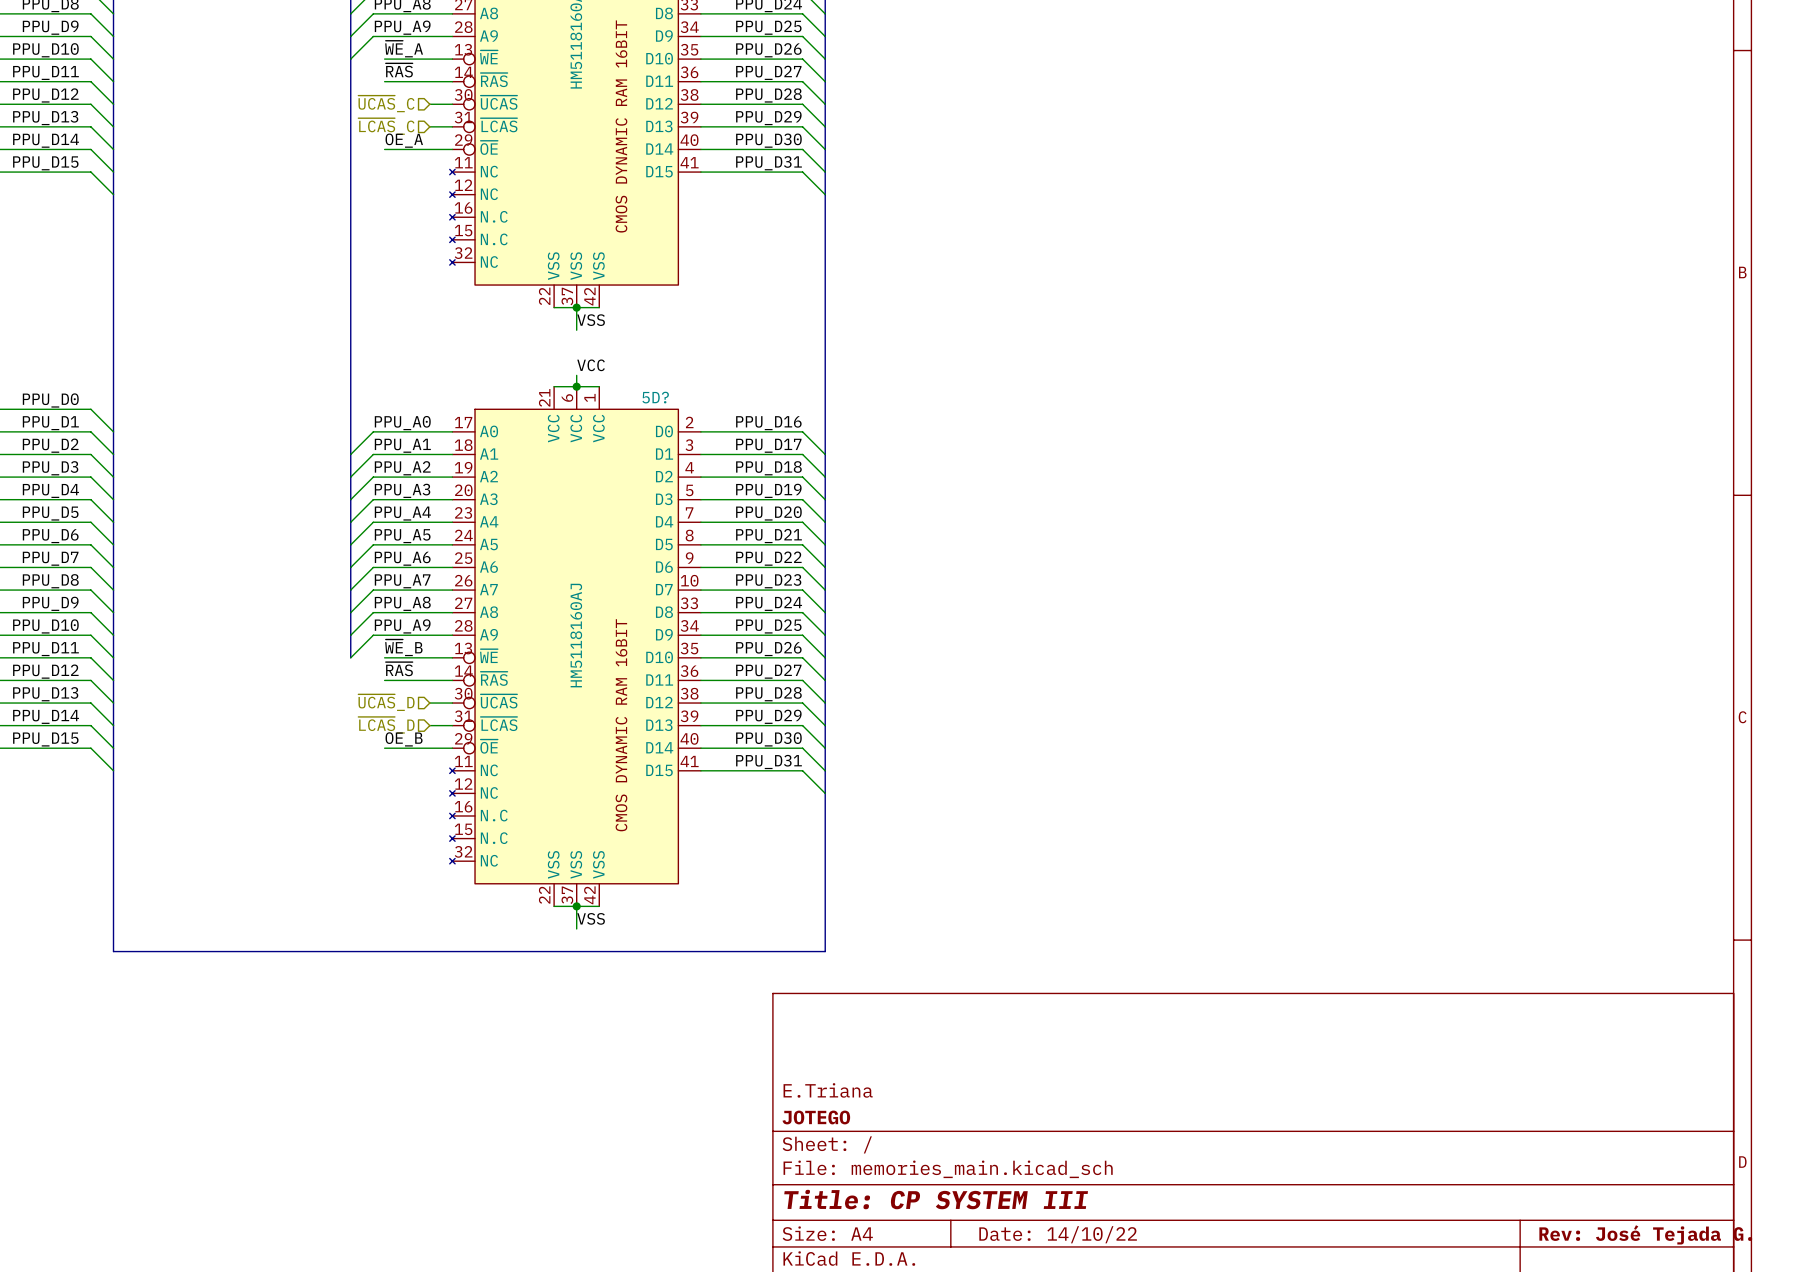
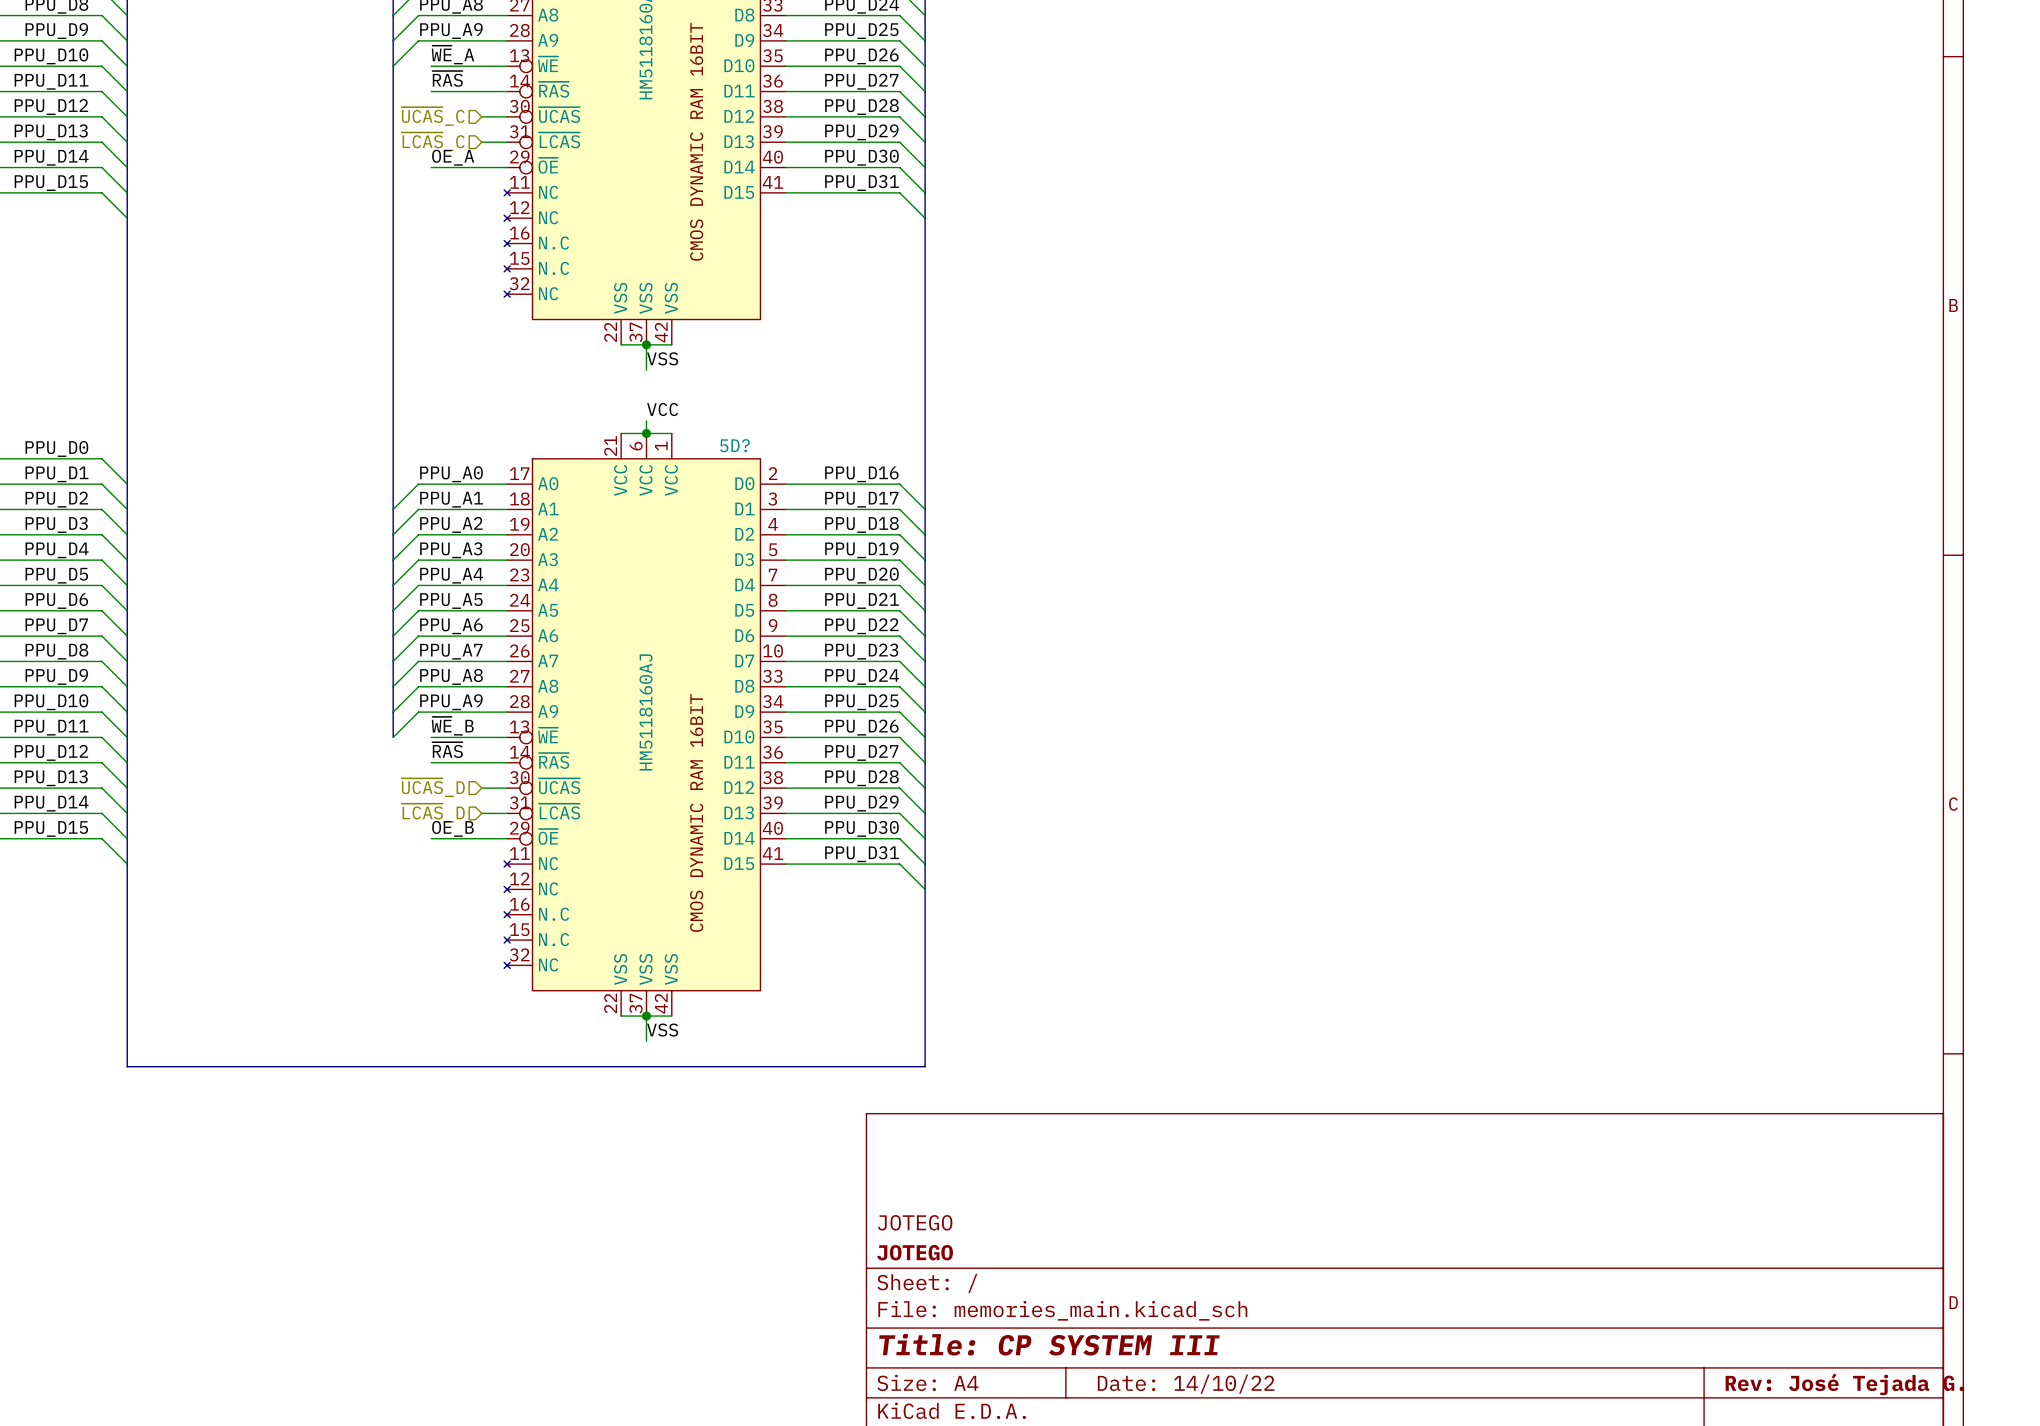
title block: E.Triana (828, 1090) -> JOTEGO (915, 1222)

